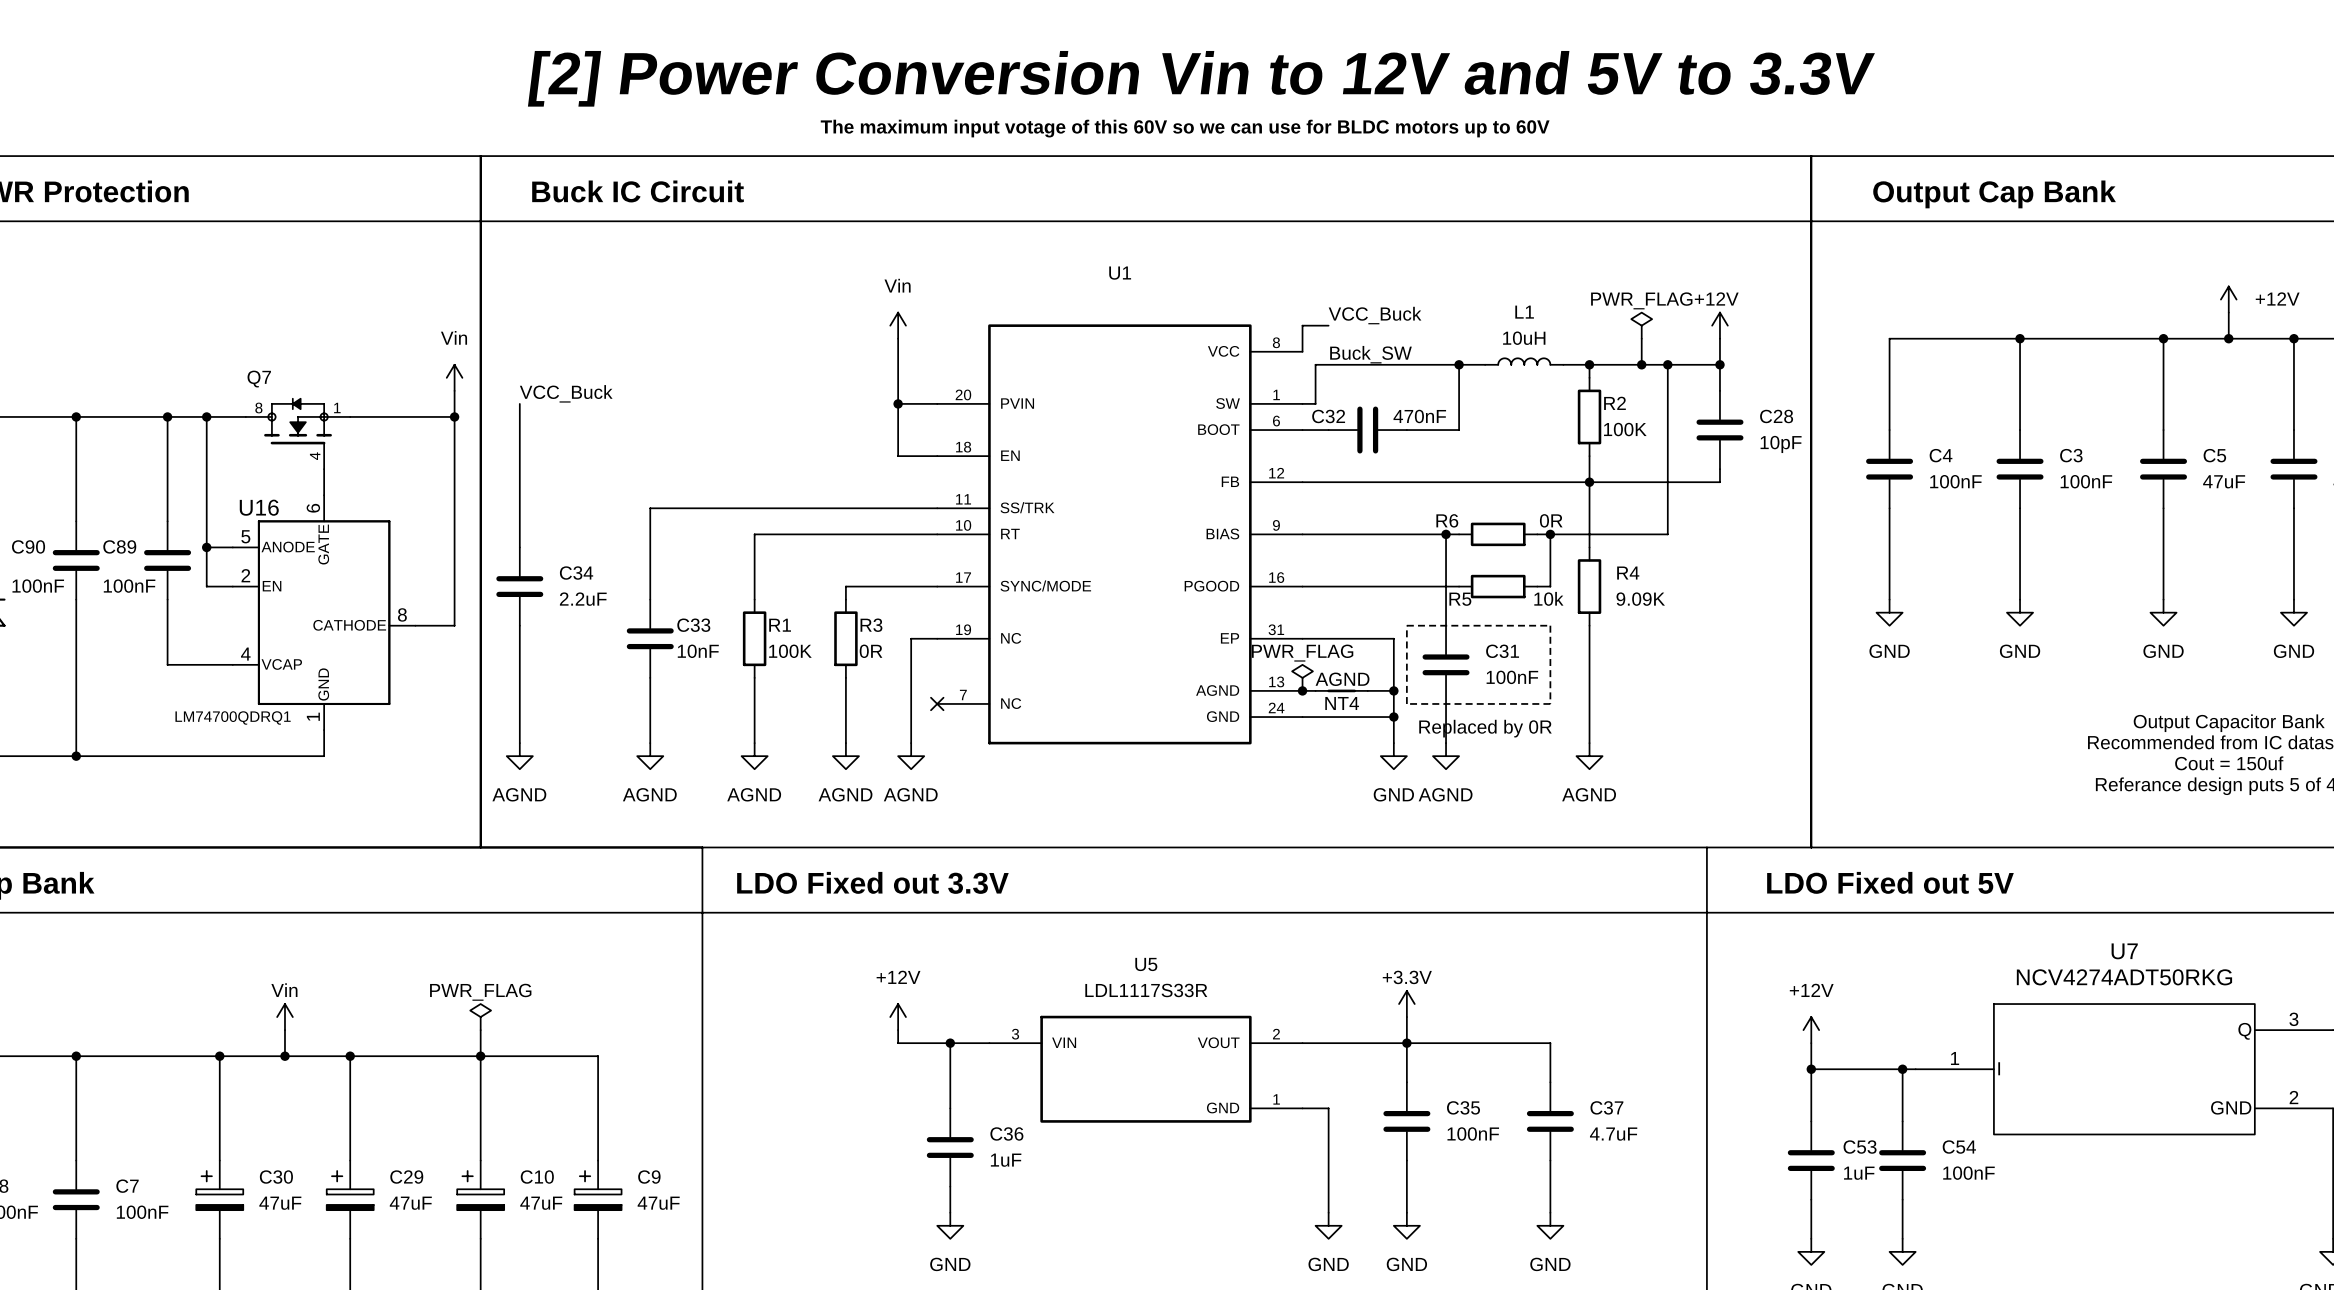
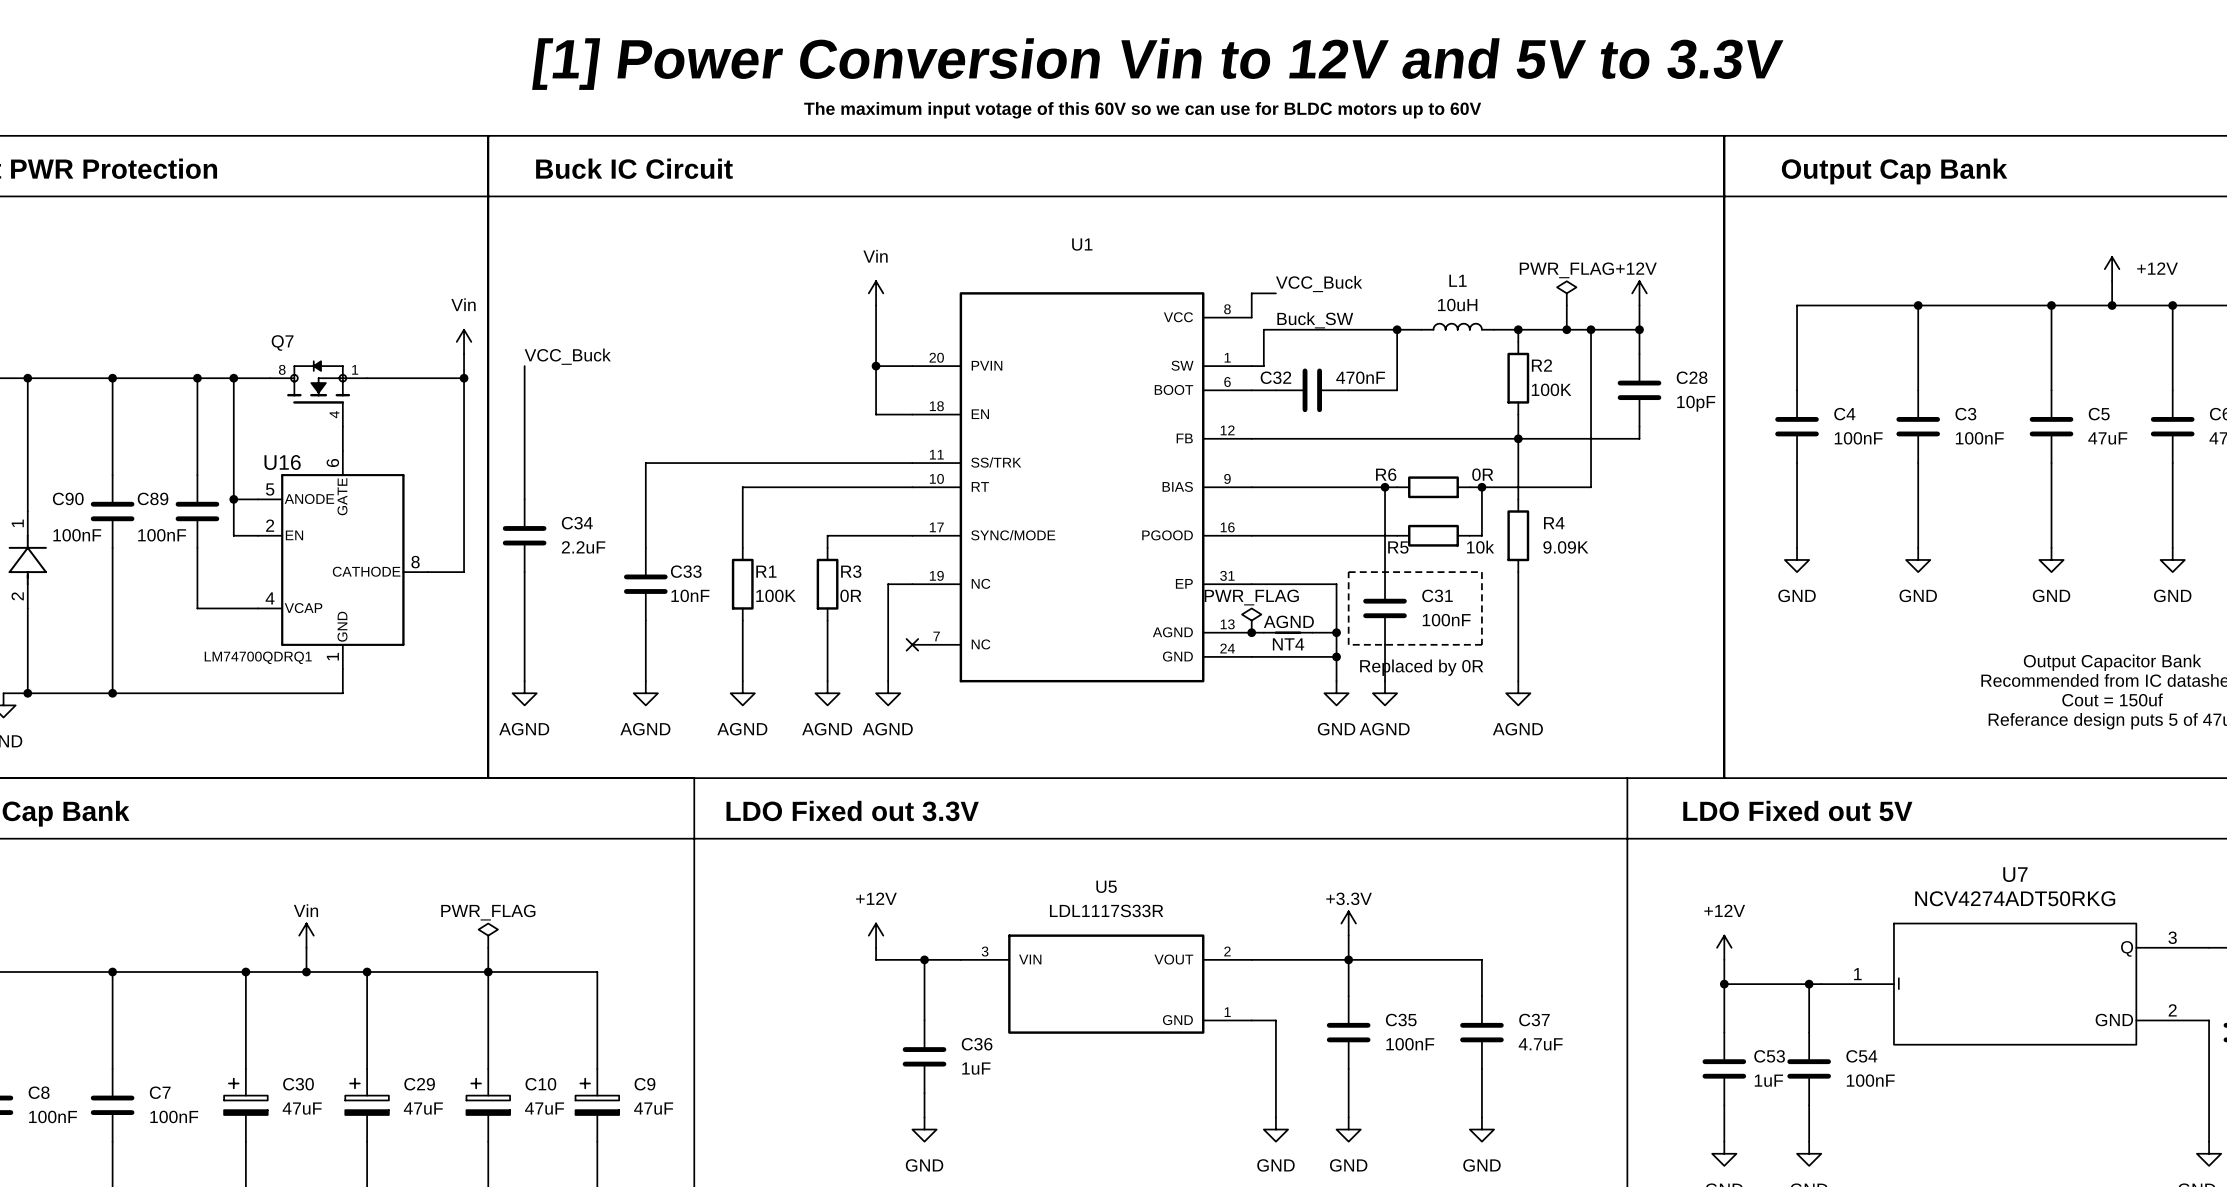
text: [2] Power Conversion Vin to 12V and 5V to 3.3V (1201, 78) -> [1] Power Conversion Vin to 12V and 5V to 3.3V (1157, 64)

